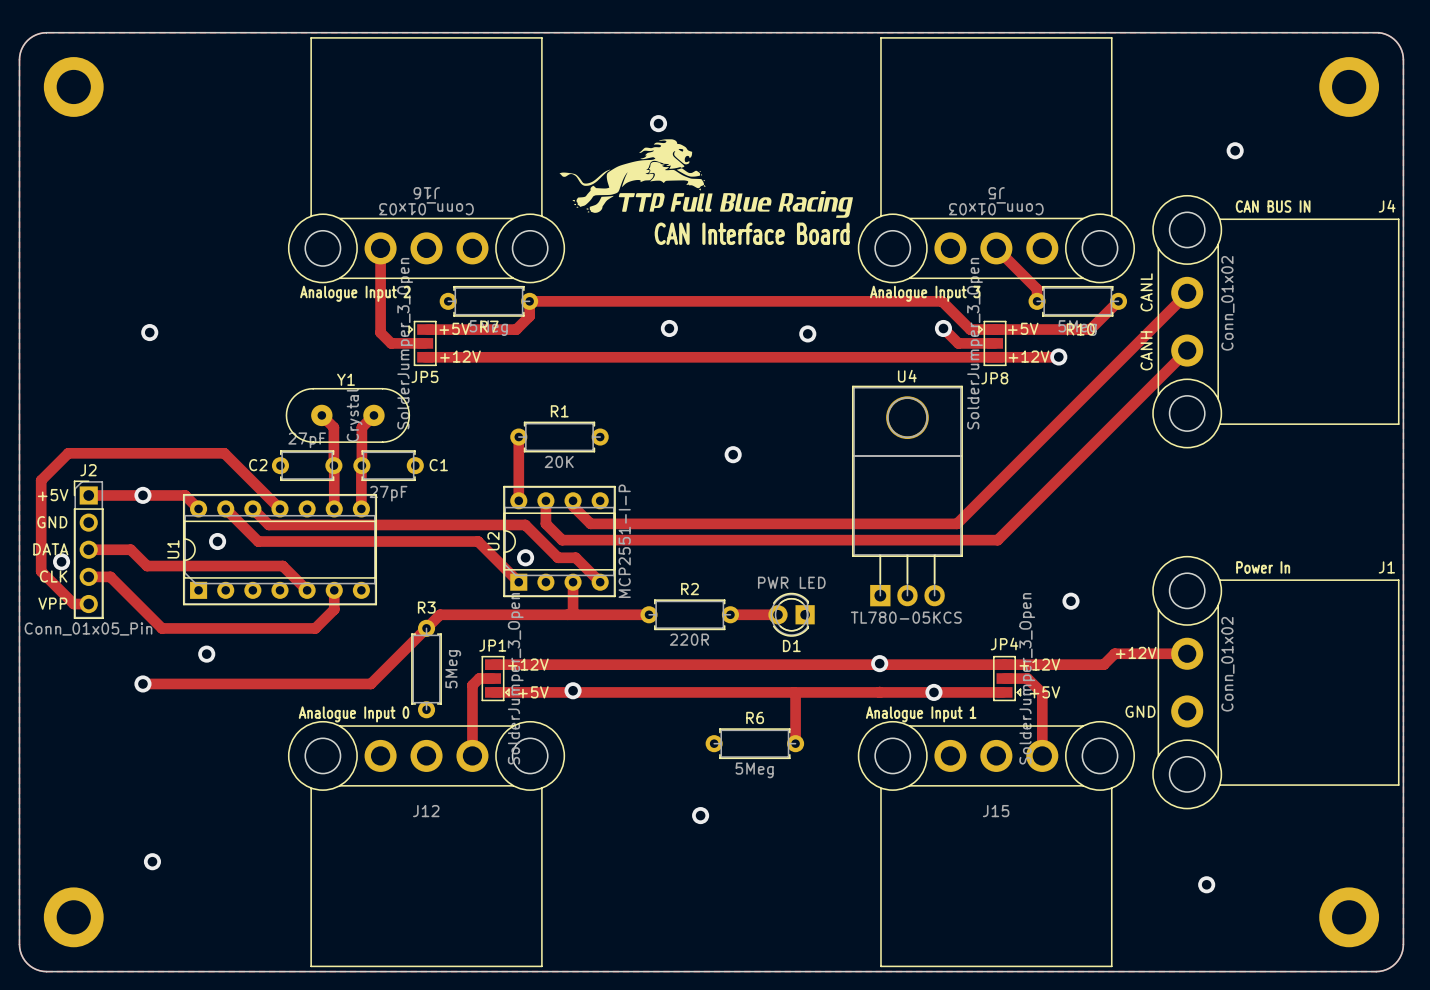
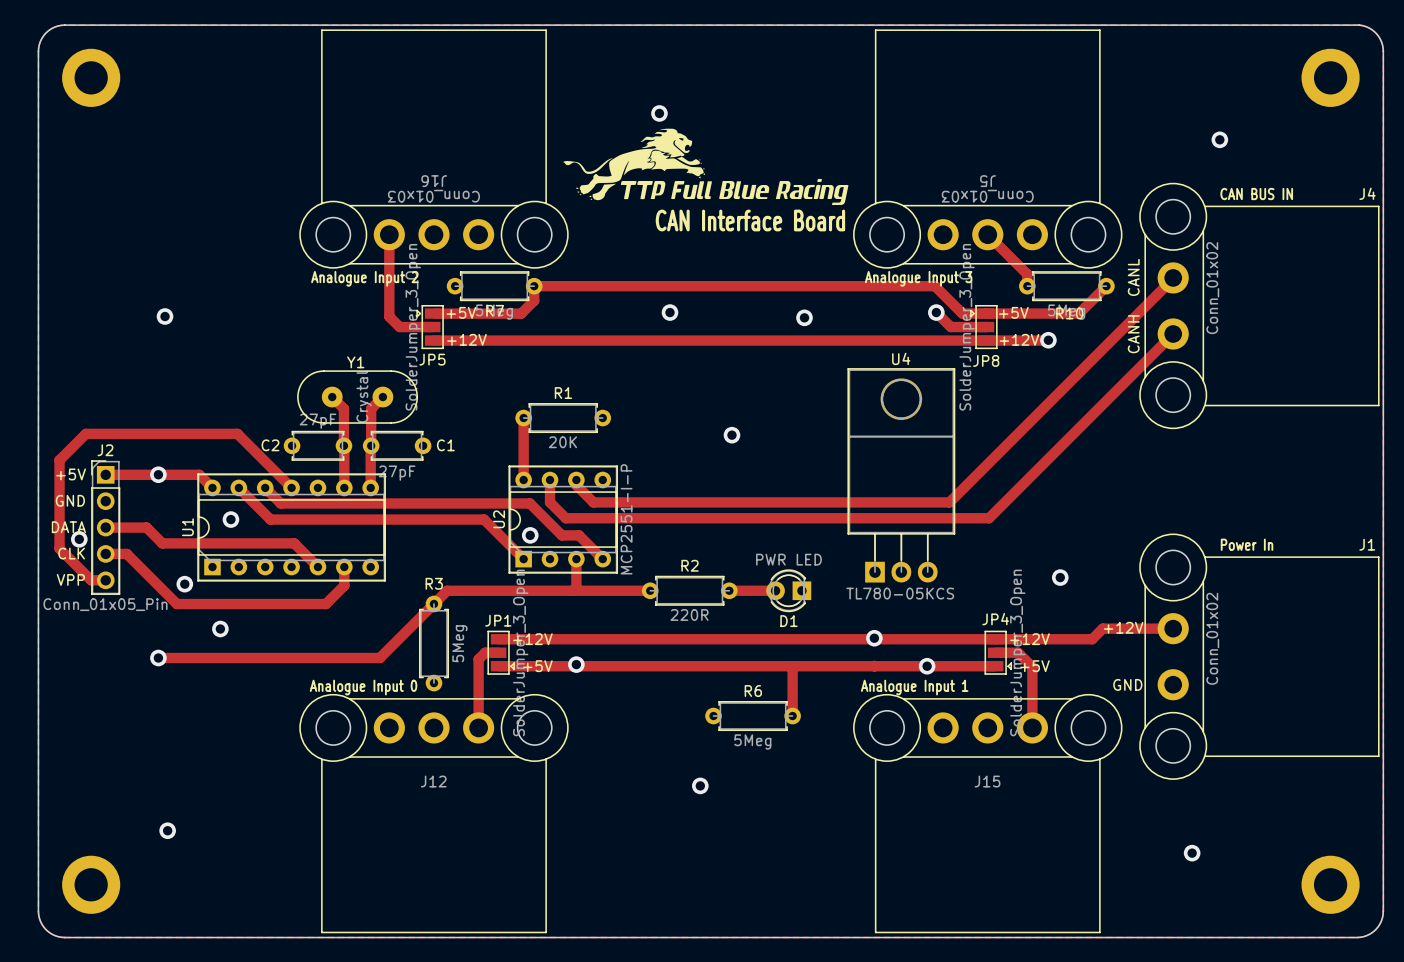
via: none -> (184, 584)

